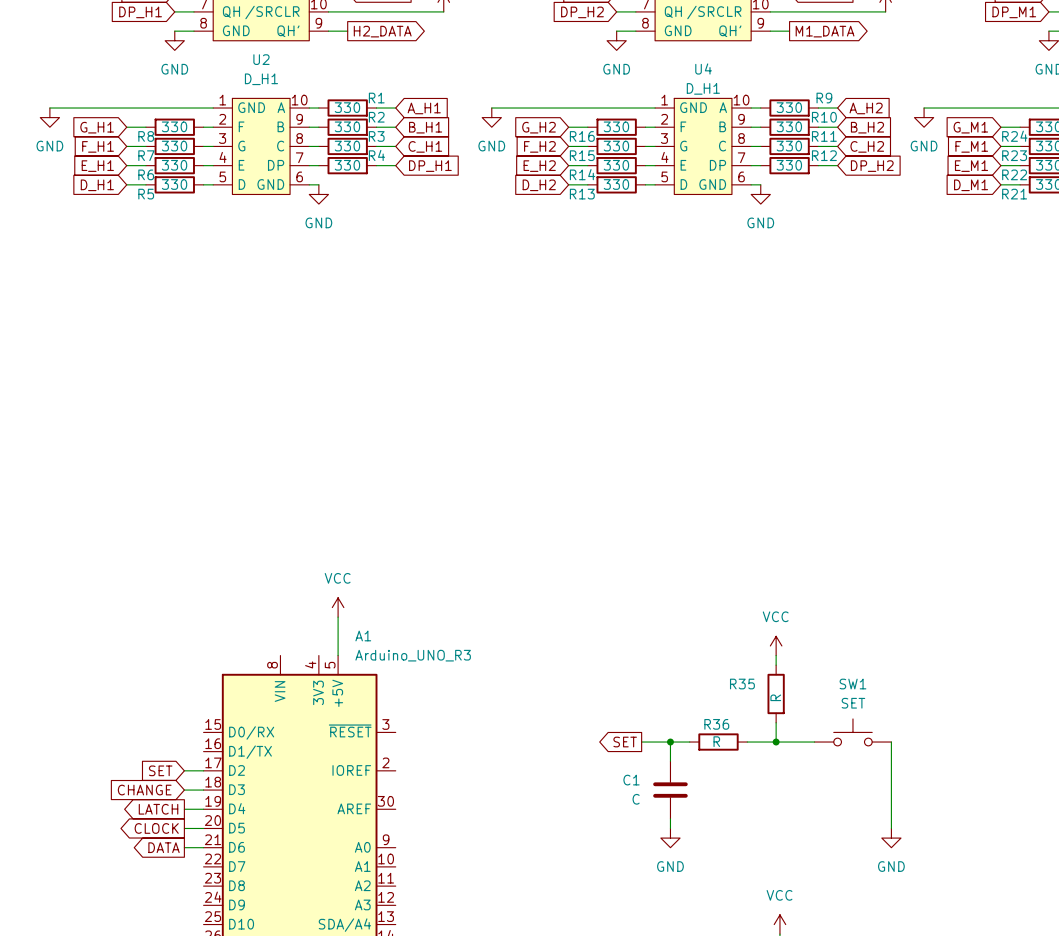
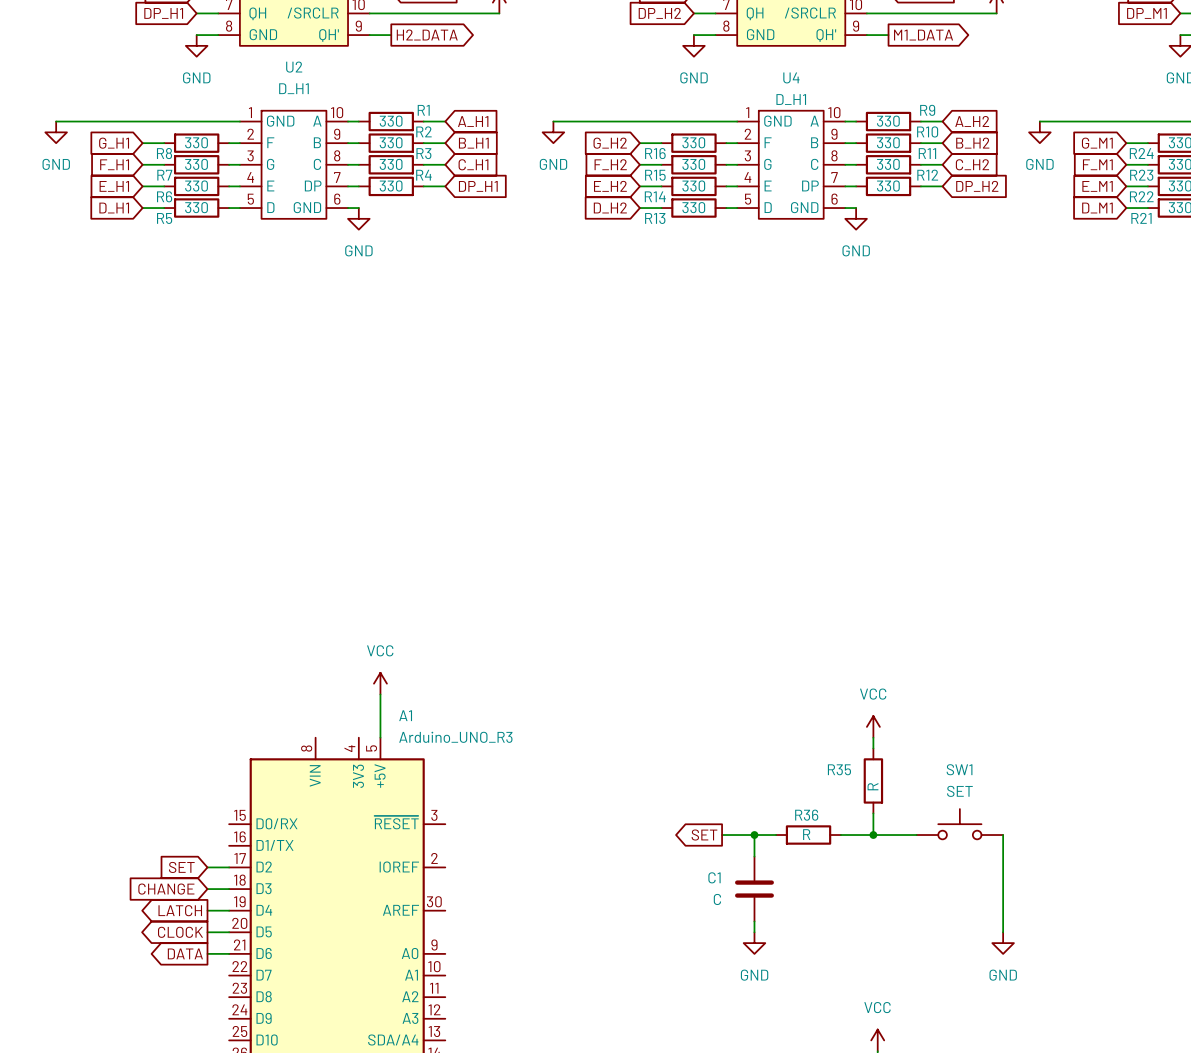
U2 symbol: [213, 98, 310, 195] -> [239, 110, 349, 219]
U4 symbol: [655, 98, 752, 195] -> [737, 110, 846, 219]

